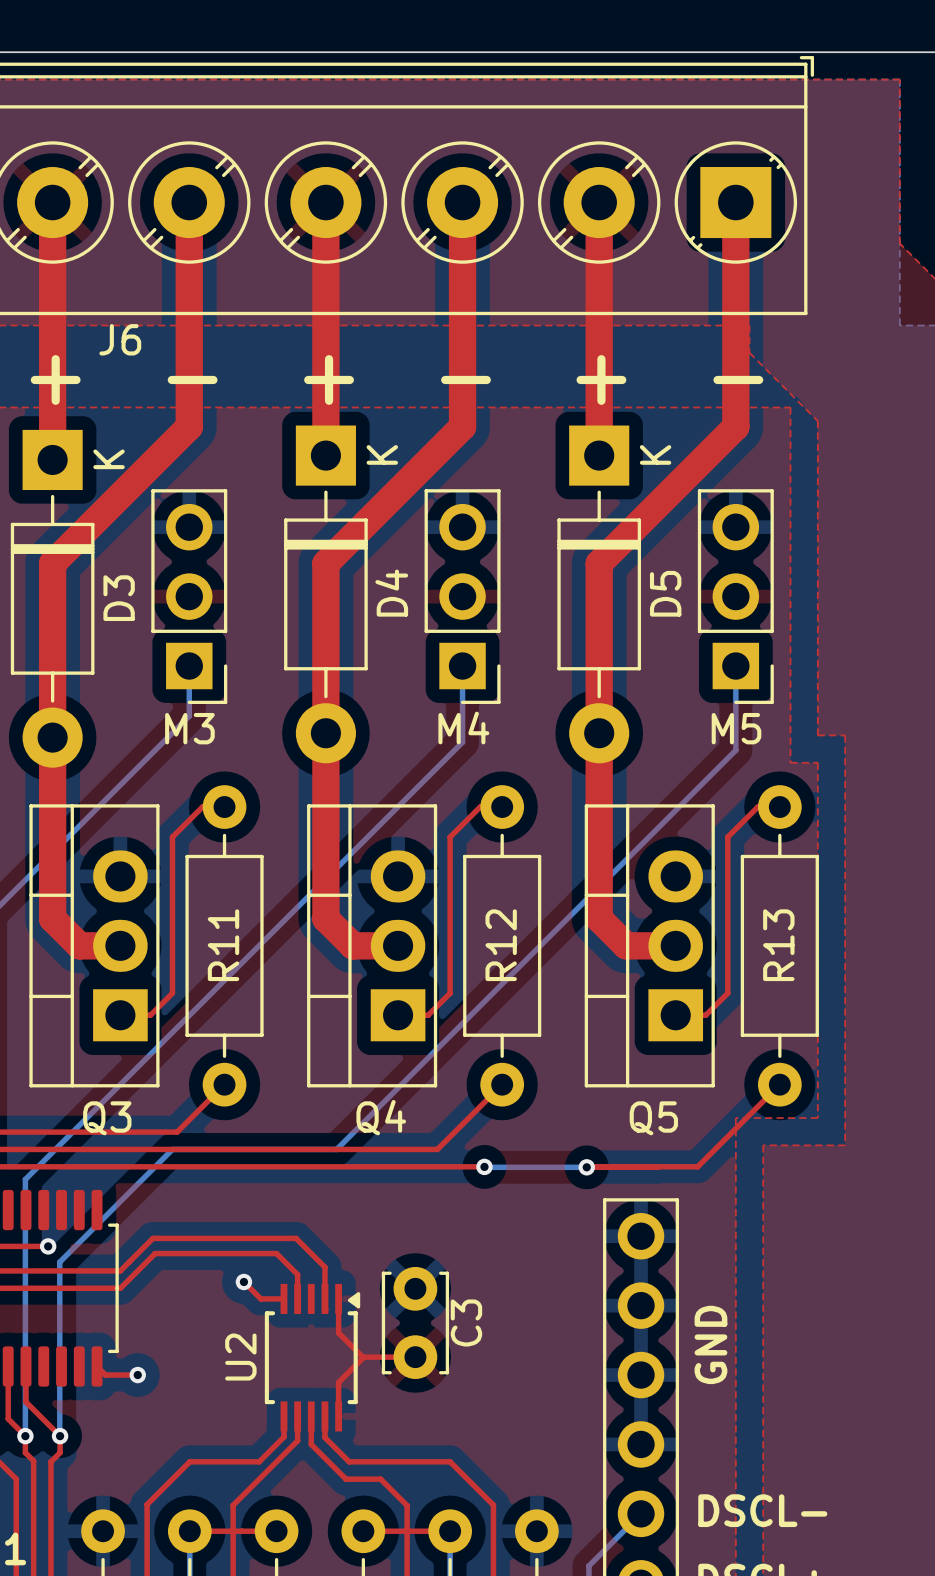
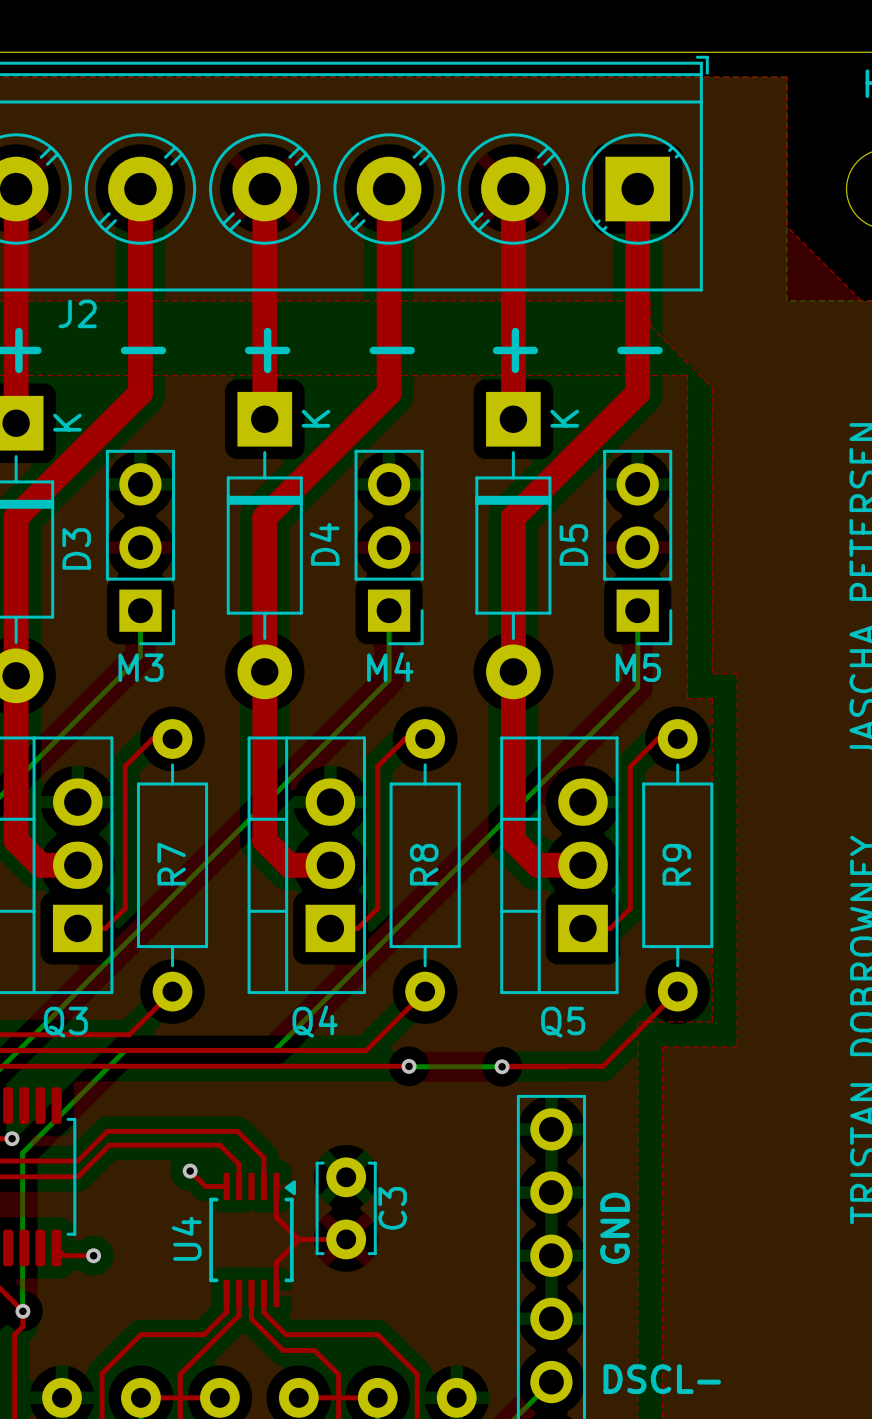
J6 name: J6 (120, 339) -> J2 (77, 313)
R11 name: R11 (223, 945) -> R7 (171, 864)
R12 name: R12 (501, 945) -> R8 (424, 864)
R13 name: R13 (778, 945) -> R9 (676, 864)
U2 name: U2 (240, 1357) -> U4 (186, 1238)

